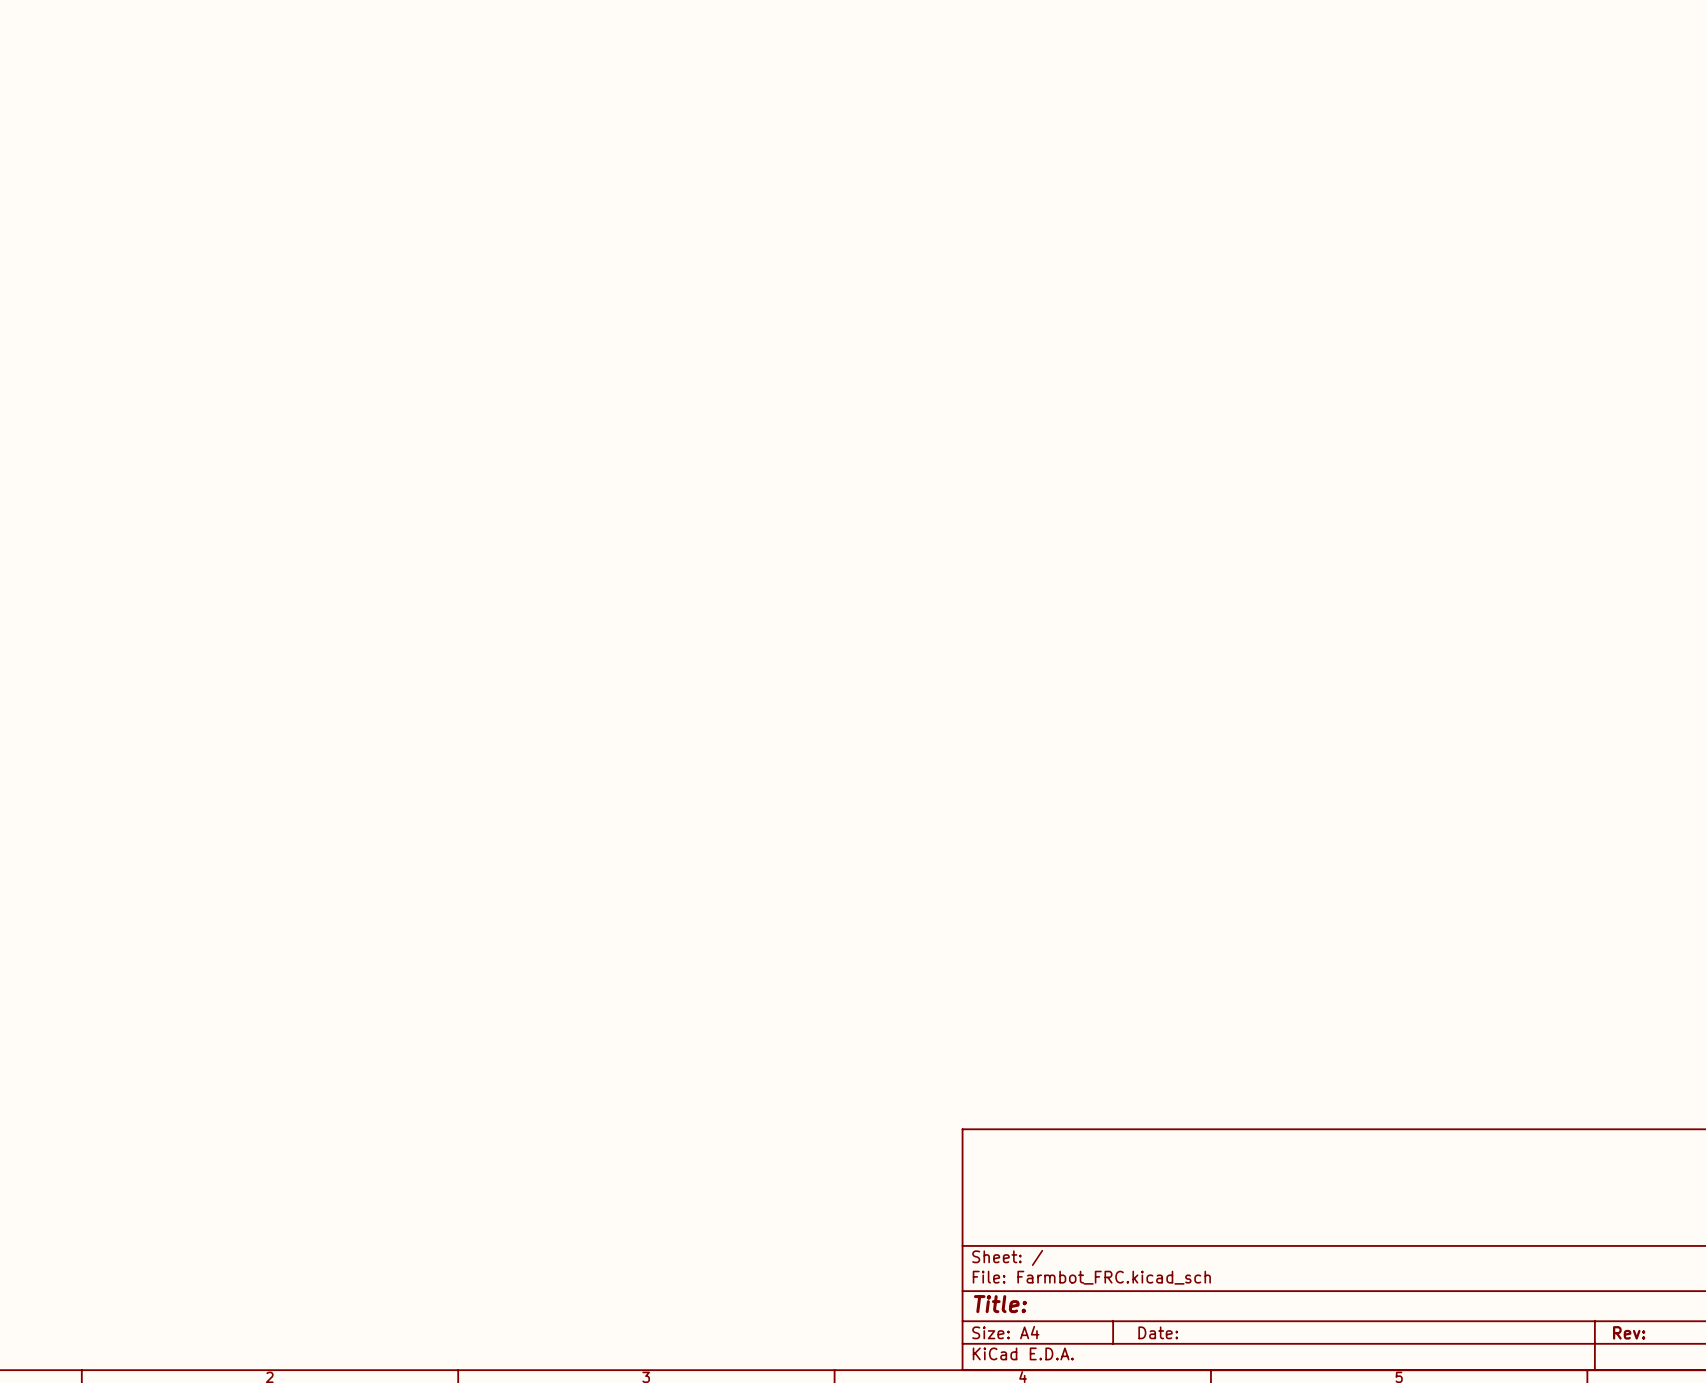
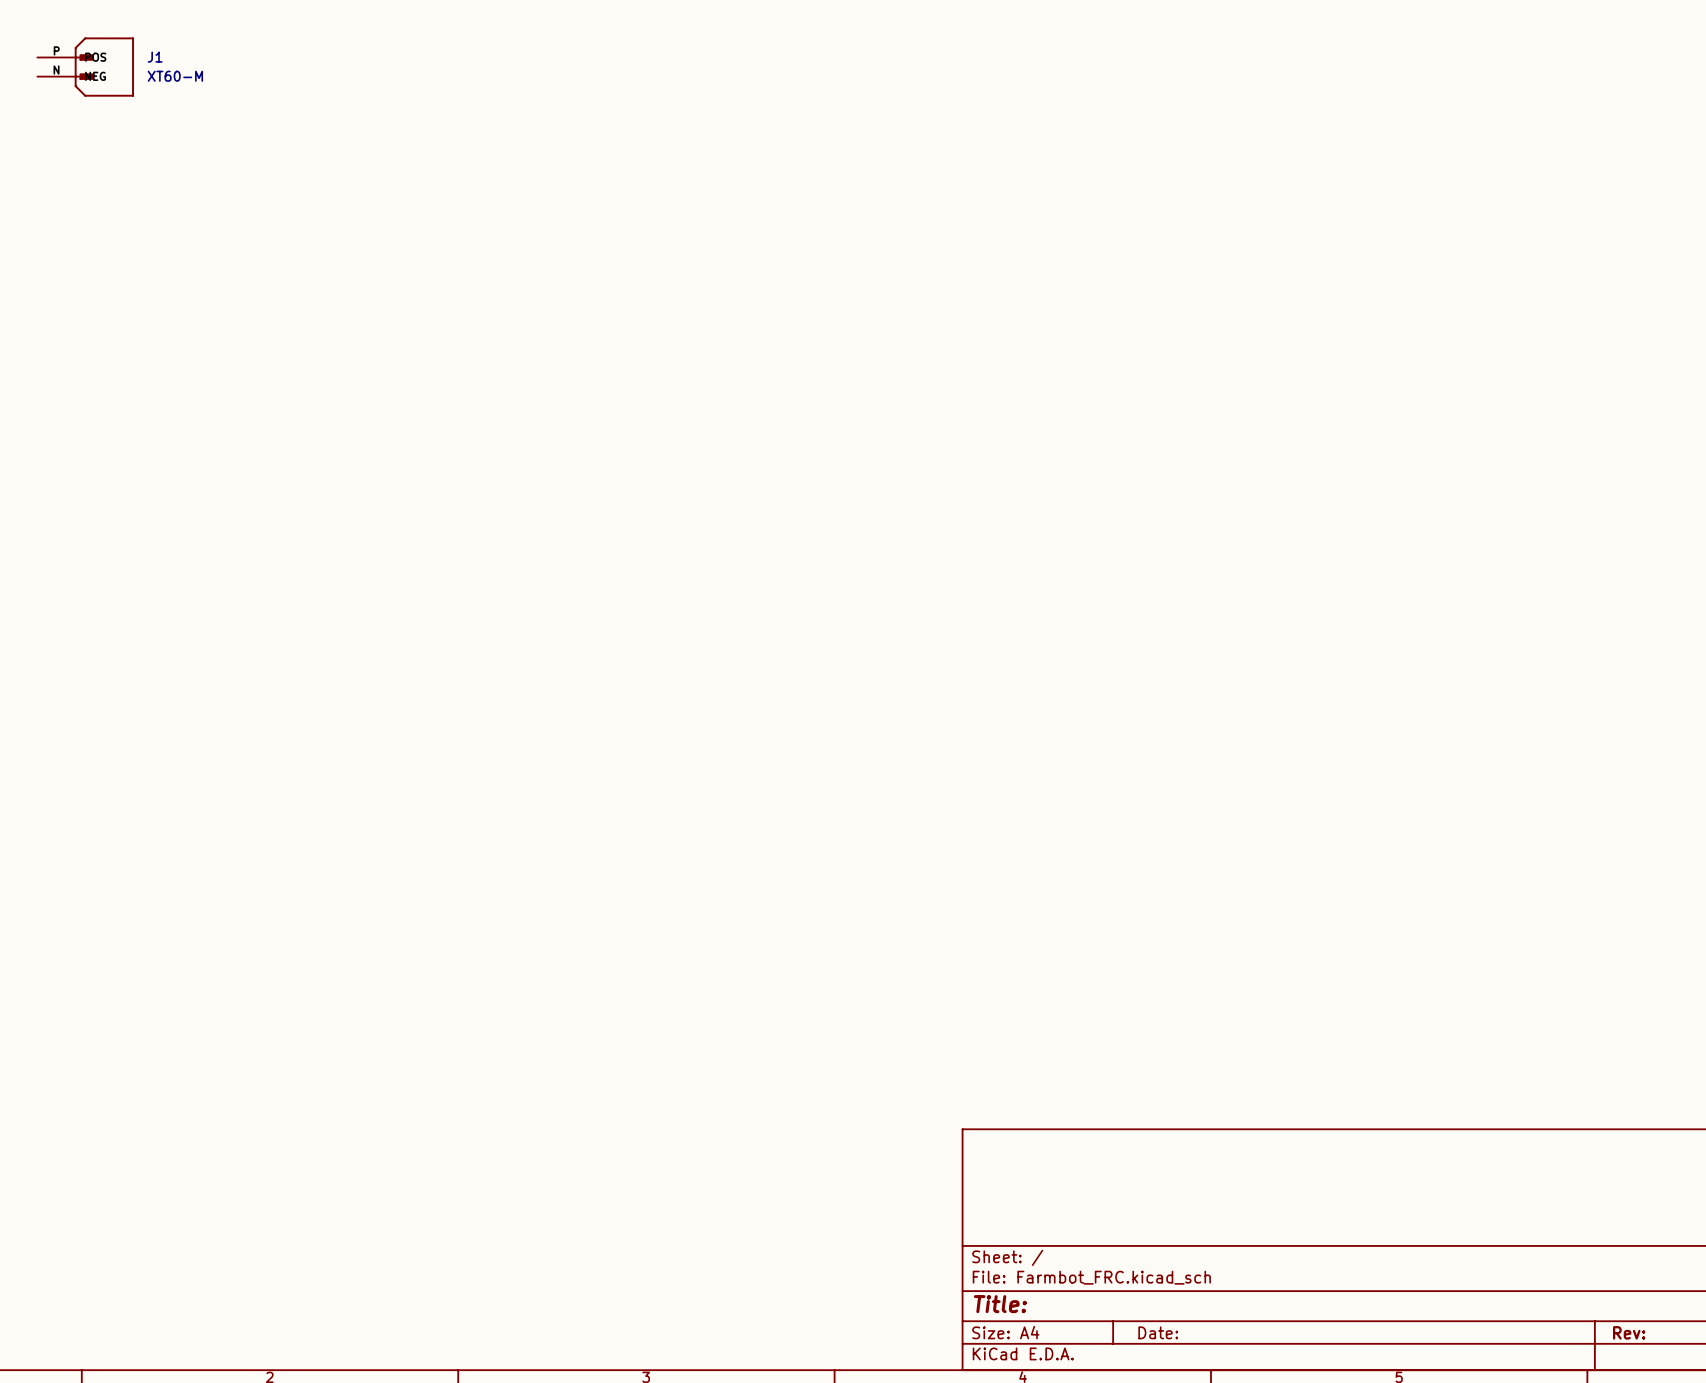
J1: none -> XT60-M (85, 67)

